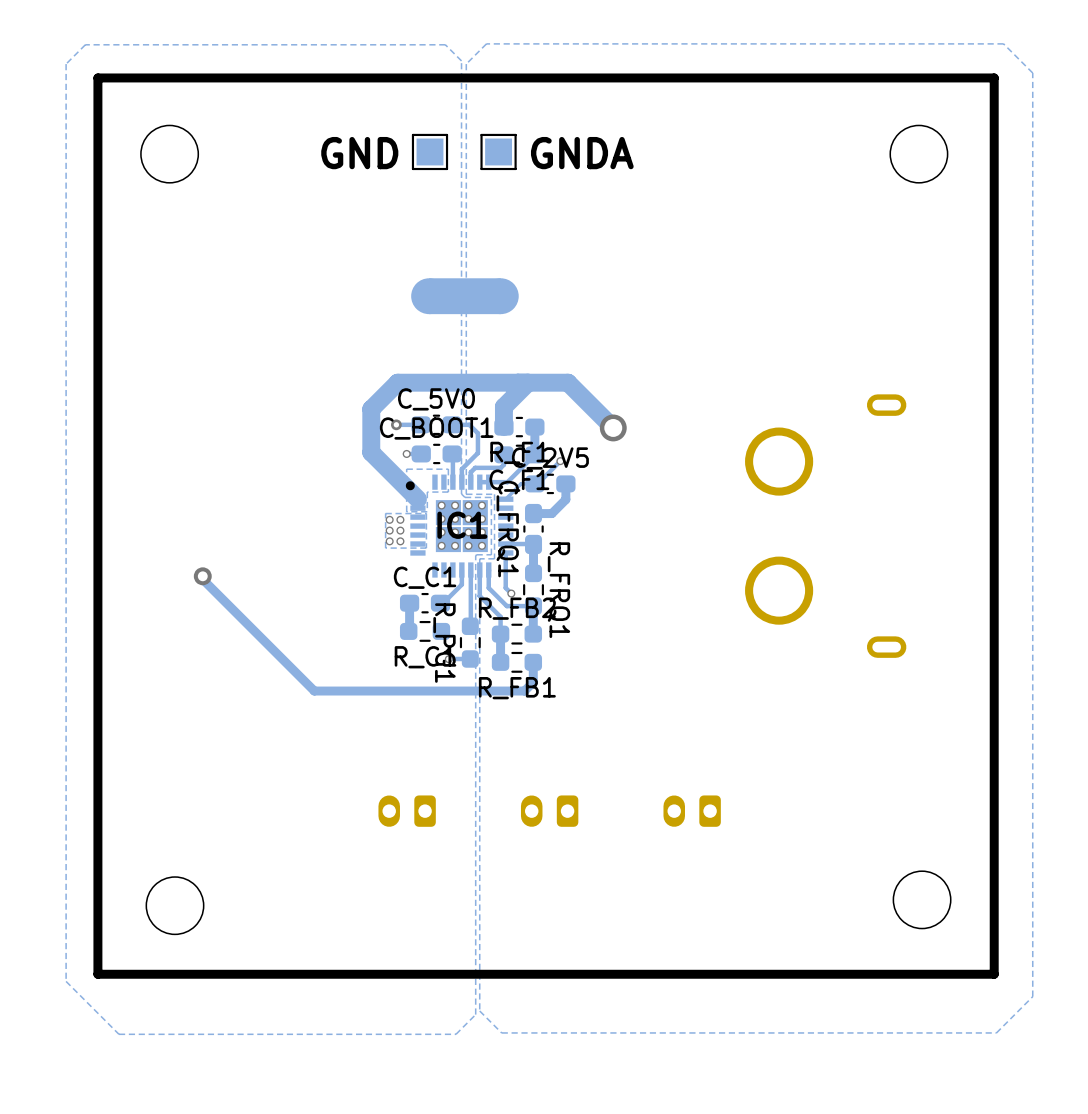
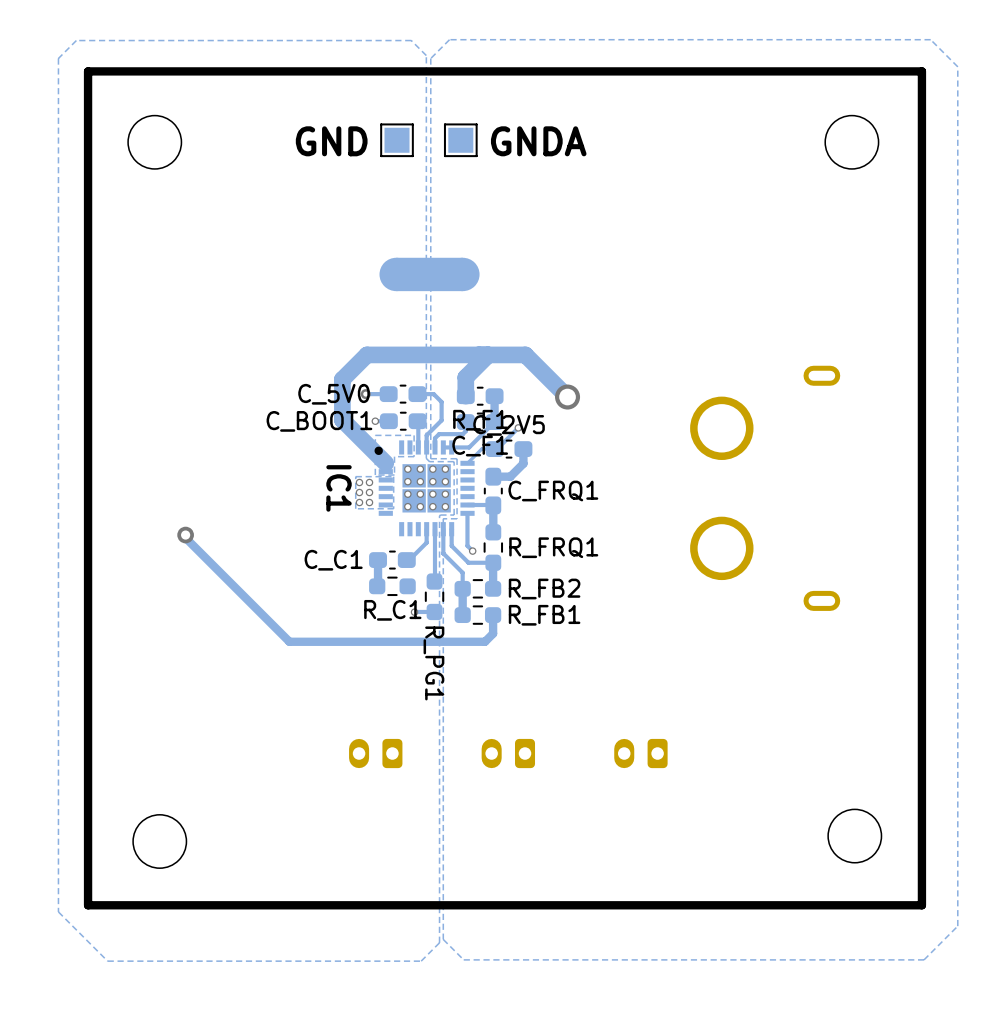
C_5V0 name position: C_5V0 (436, 399) -> C_5V0 (334, 394)
C_BOOT1 name position: C_BOOT1 (436, 428) -> C_BOOT1 (319, 421)
IC1 name rotation: 0° (462, 525) -> 90° clockwise (339, 488)
IC1 name position: IC1 (462, 525) -> IC1 (339, 488)
C_FRQ1 name rotation: 0° (507, 529) -> 90° counterclockwise (553, 491)
C_C1 name position: C_C1 (425, 577) -> C_C1 (333, 560)
R_FRQ1 name rotation: 0° (558, 590) -> 90° counterclockwise (553, 547)
R_FB2 name position: R_FB2 (517, 608) -> R_FB2 (544, 588)
R_PG1 name position: R_PG1 (444, 643) -> R_PG1 (433, 663)
R_FB1 name position: R_FB1 (517, 688) -> R_FB1 (544, 615)

